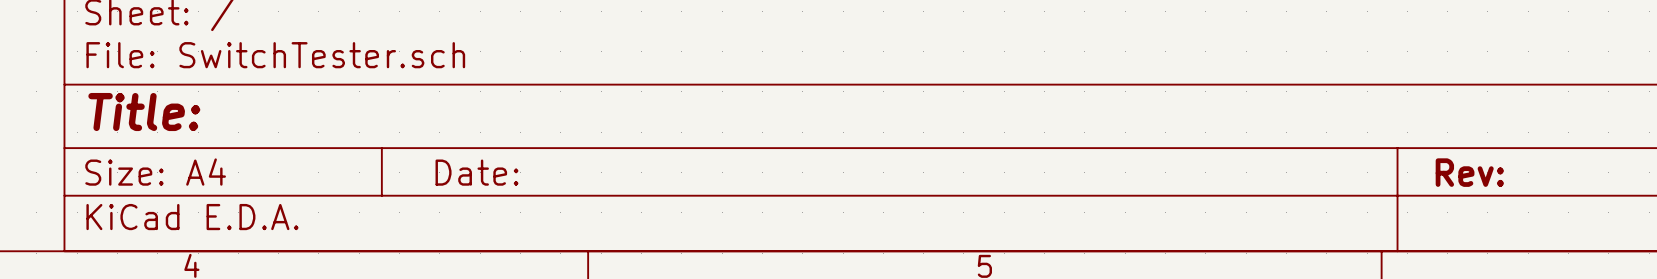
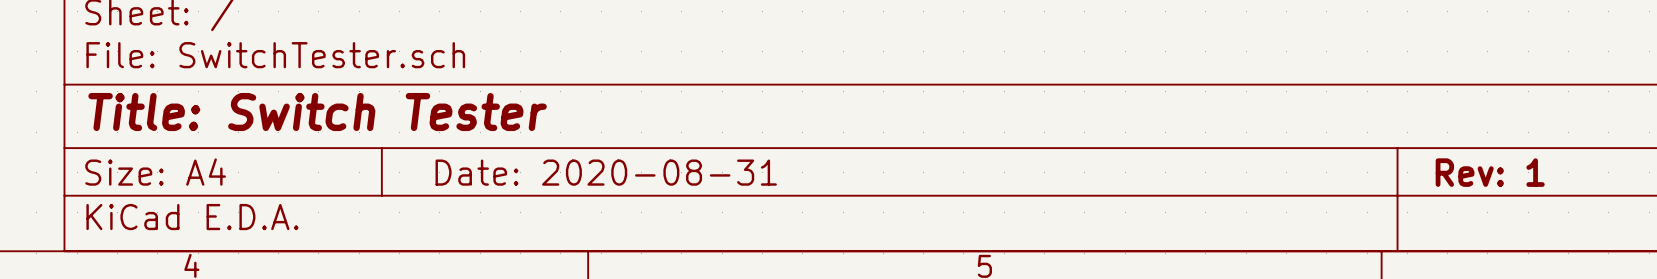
title block: Title: (144, 112) -> Title: Switch Tester (317, 112)
title block: Date: (476, 172) -> Date: 2020-08-31 (606, 172)
title block: Rev: (1469, 172) -> Rev: 1 (1490, 172)

